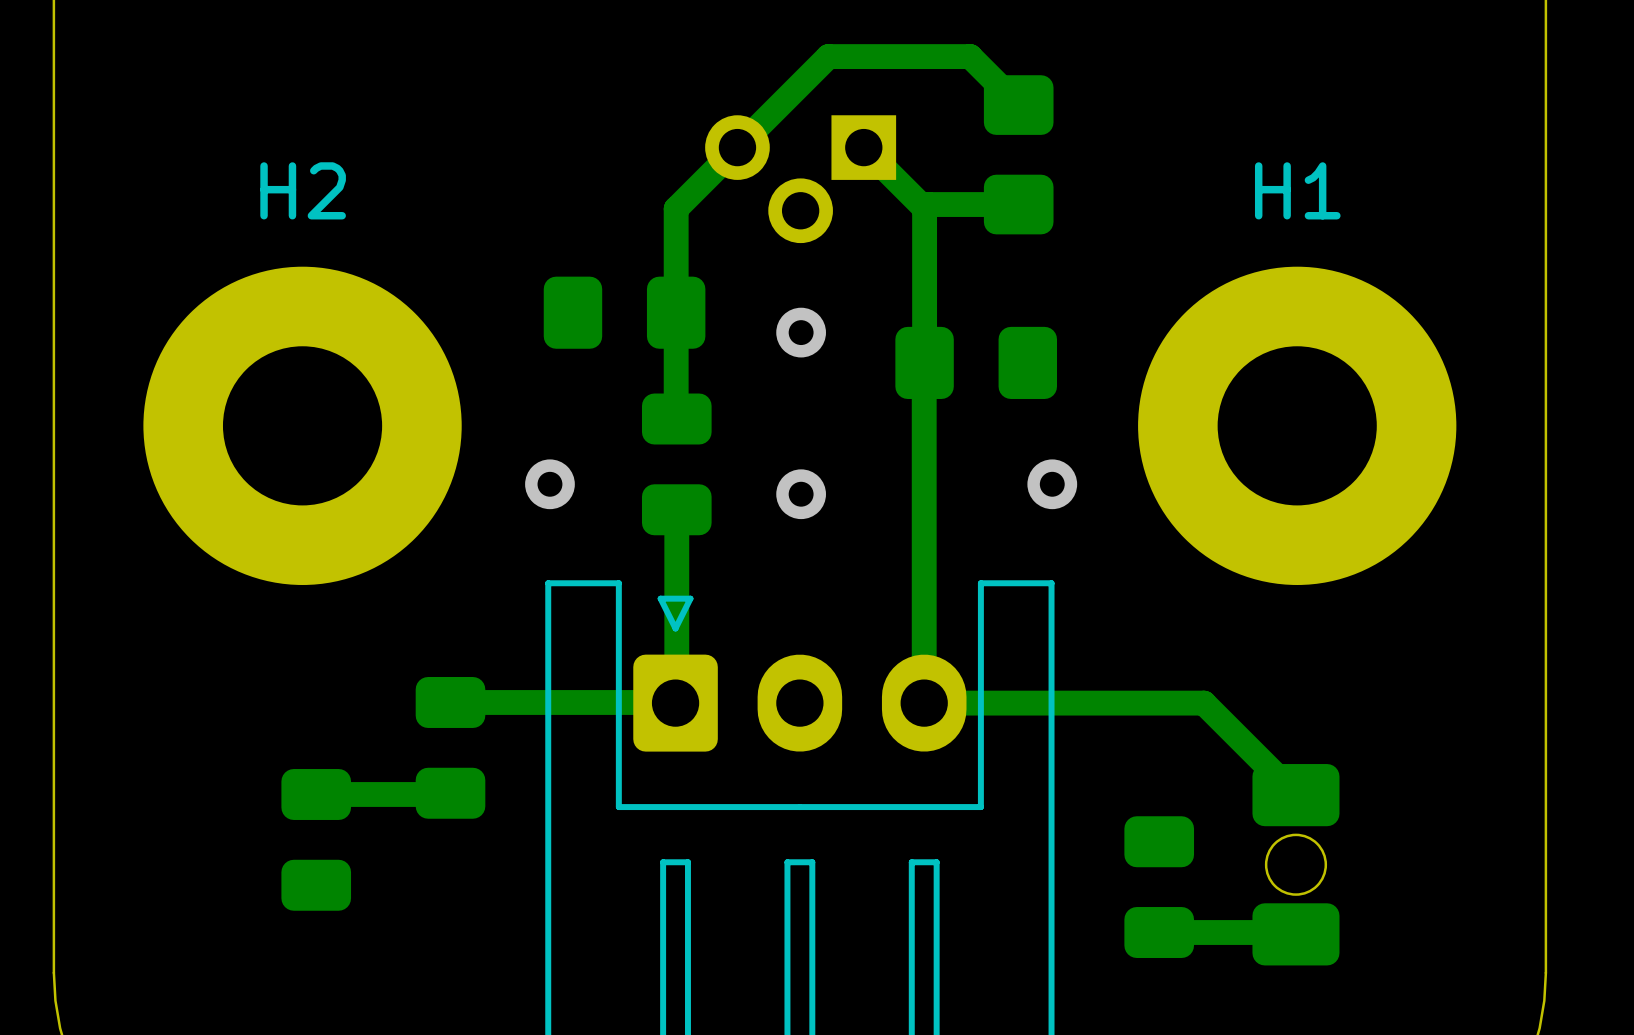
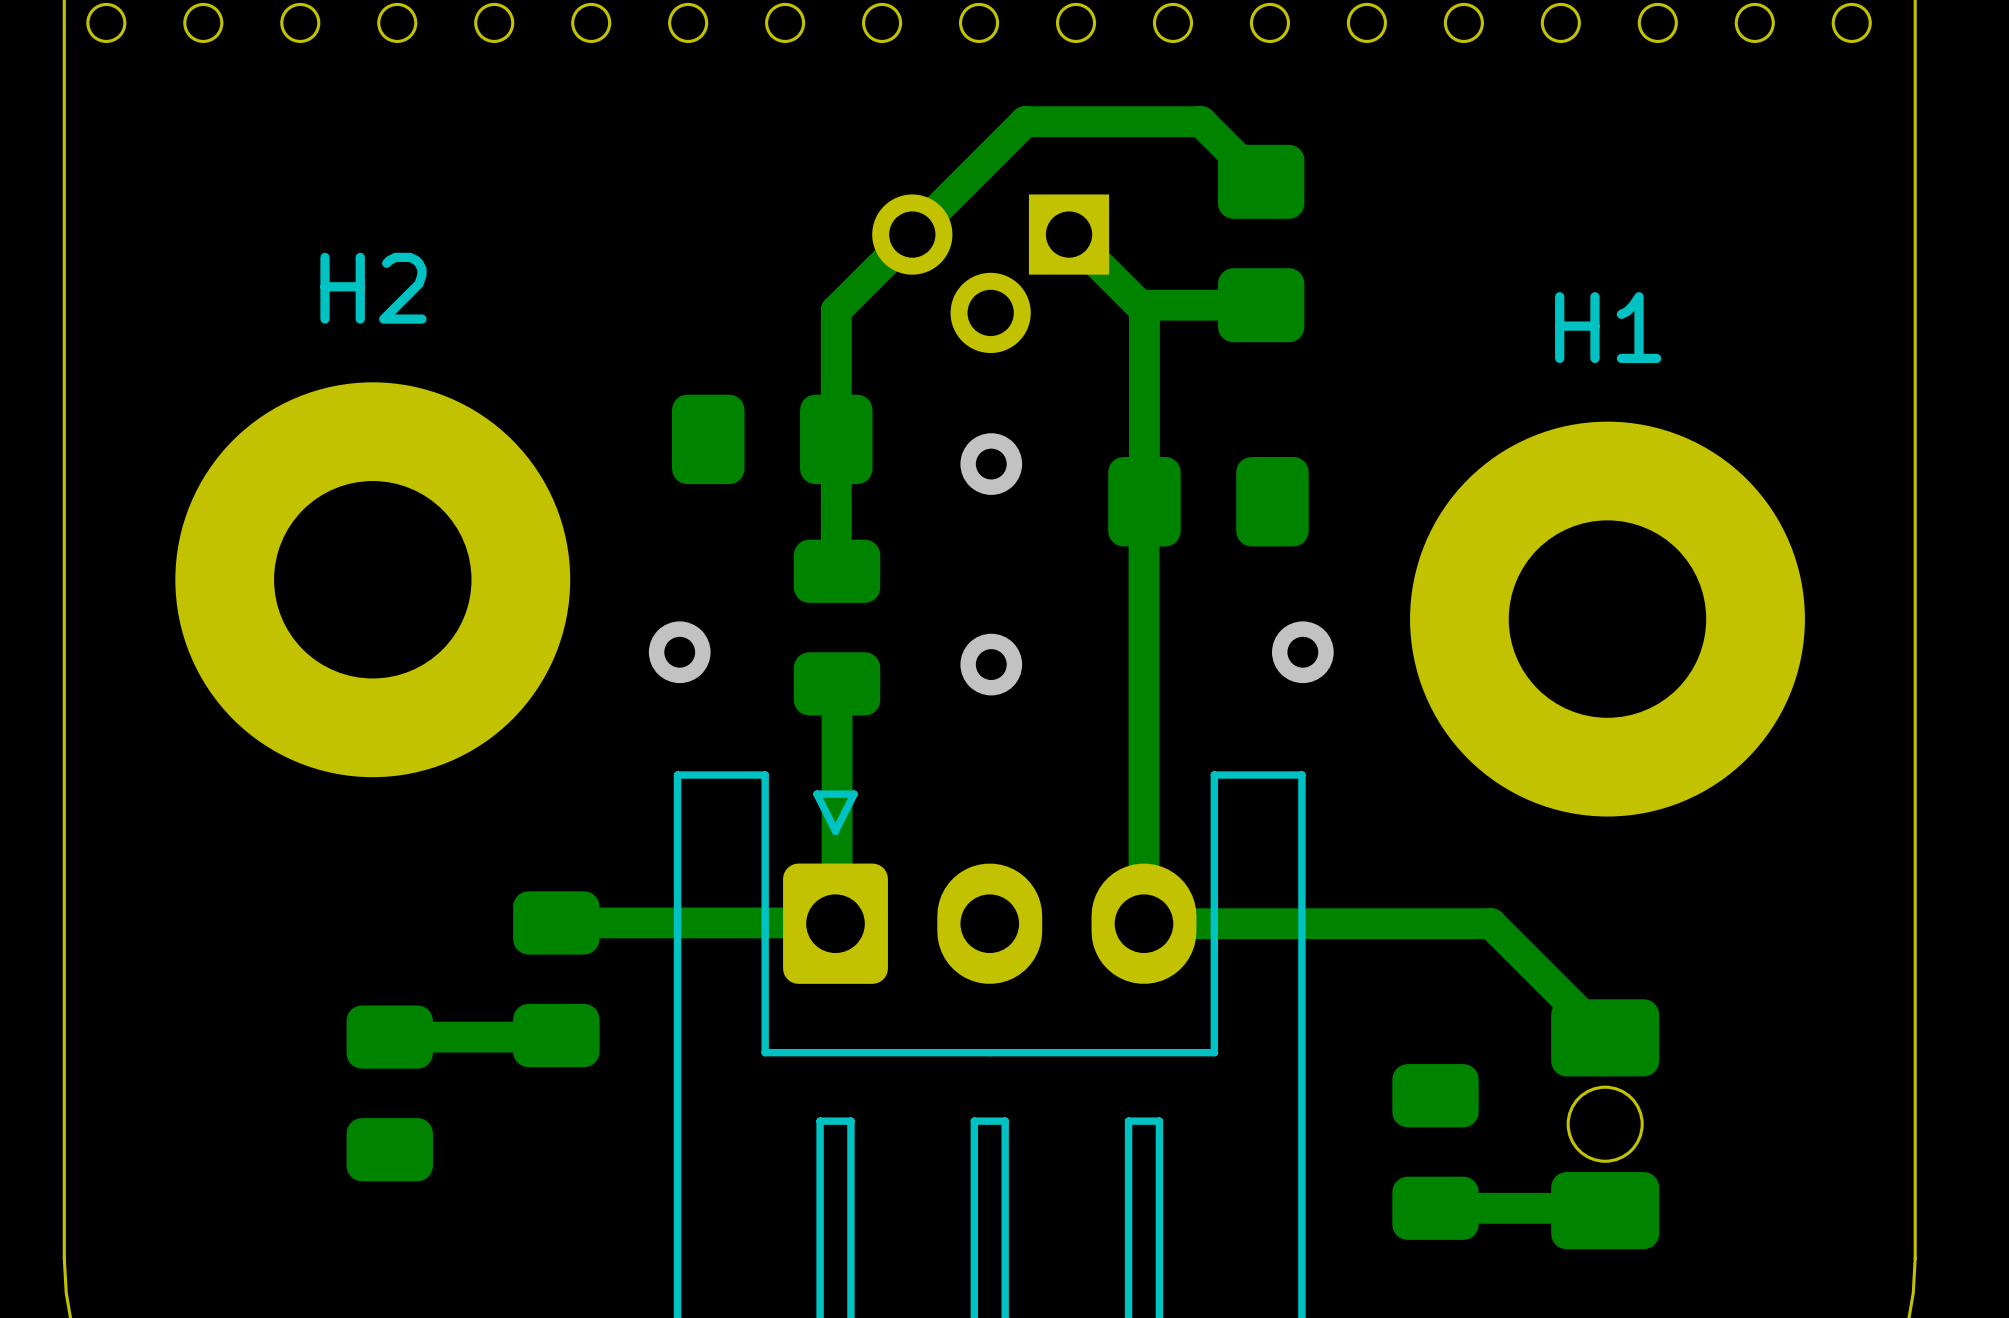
H1 position: (1297, 425) -> (1607, 619)

